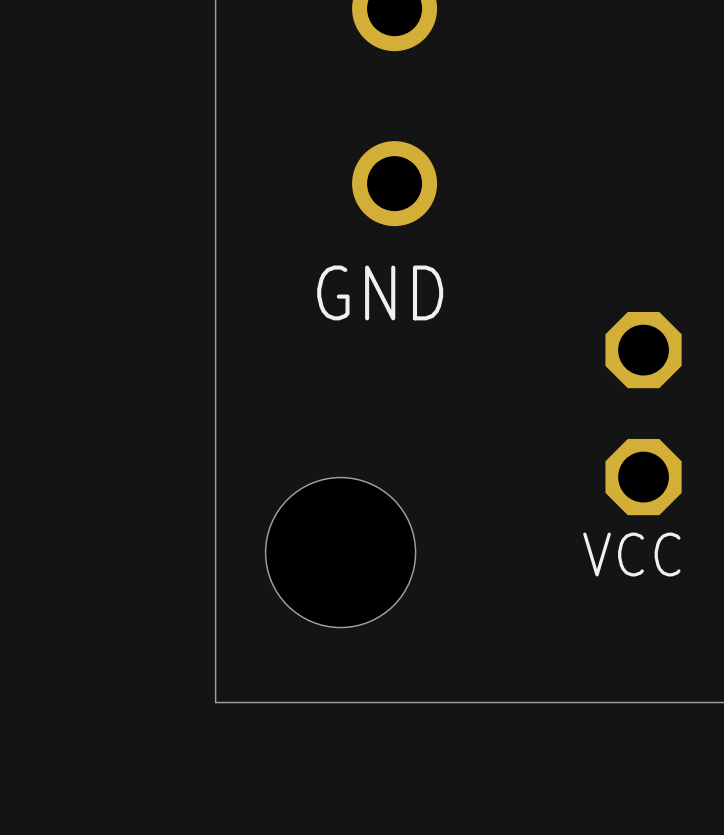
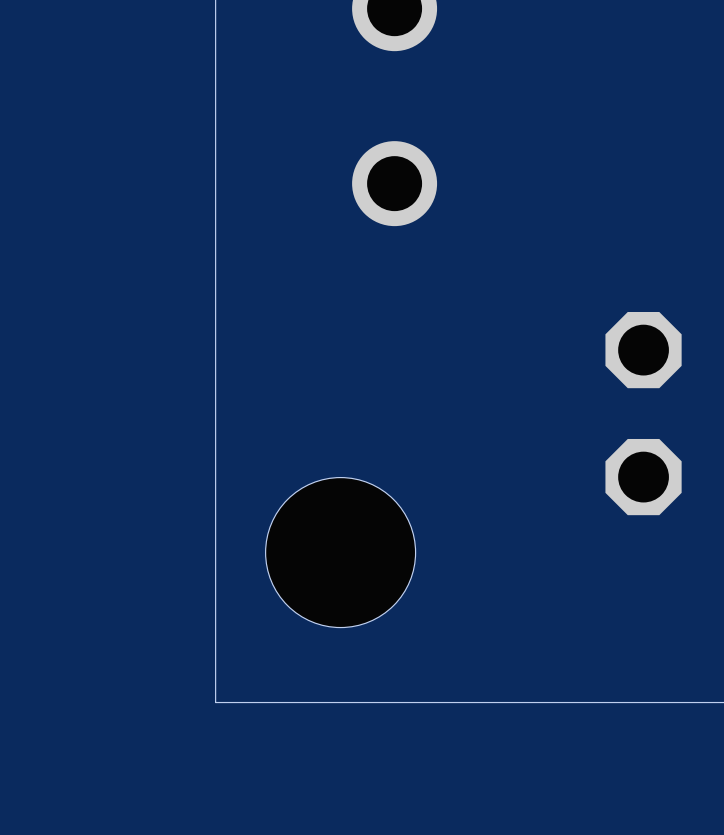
text: GND (380, 292) -> none
text: VCC (631, 554) -> none

